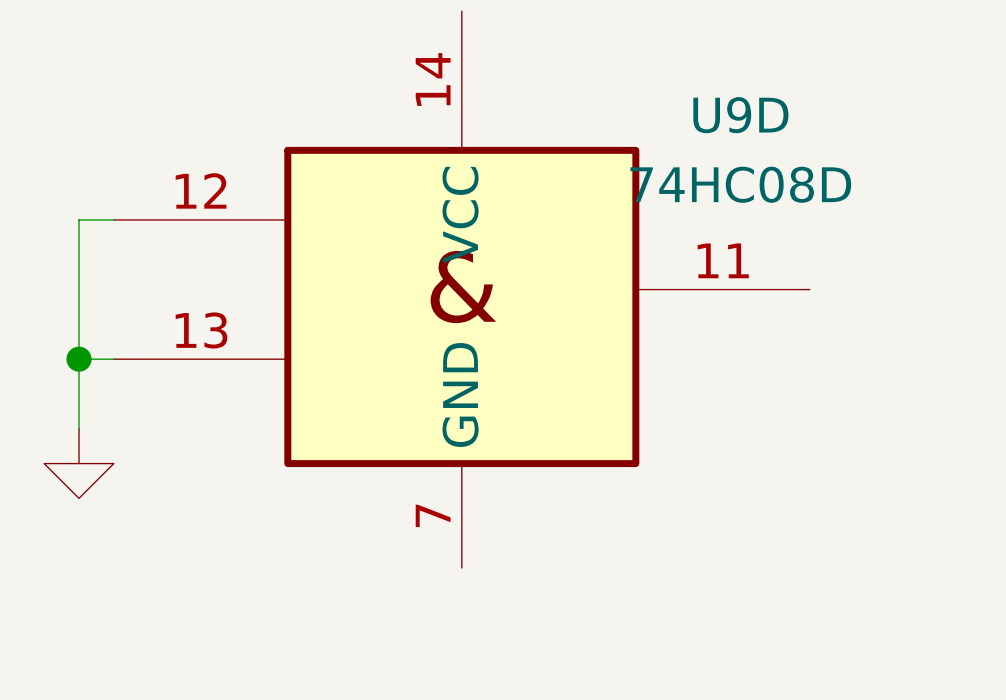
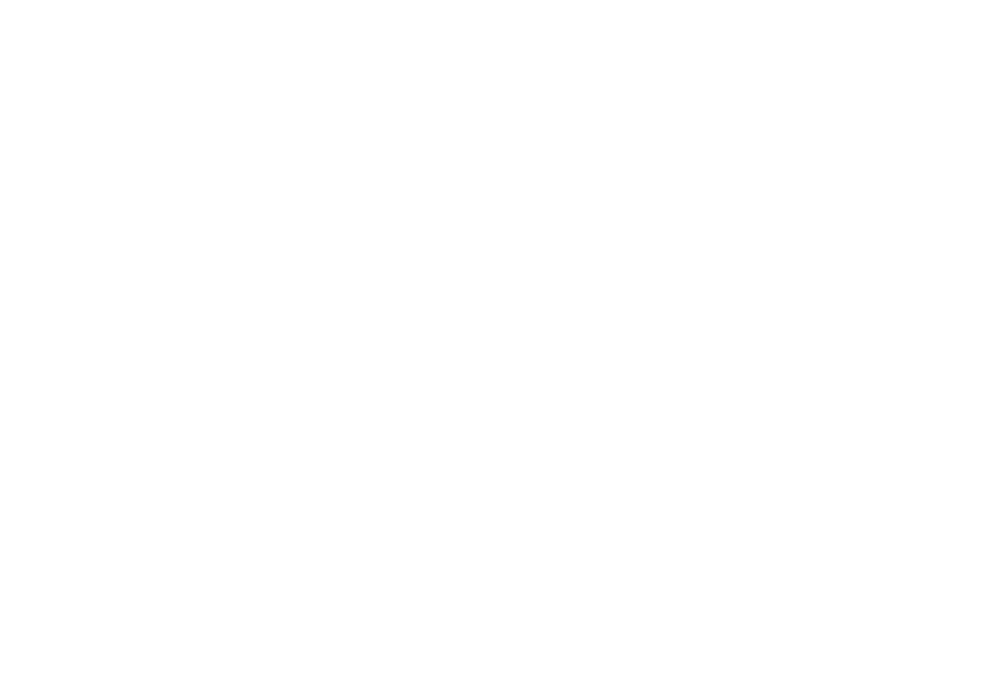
wire: (113, 219) (79, 219) (79, 428) -> none
U9D: 74HC08D (461, 289) -> none
wire: (79, 359) (113, 359) -> none
junction: (79, 359) -> none
power symbol: (79, 463) -> none

